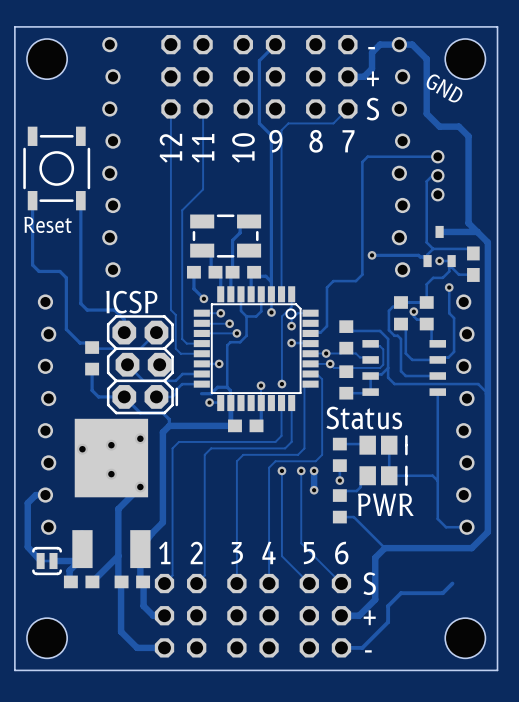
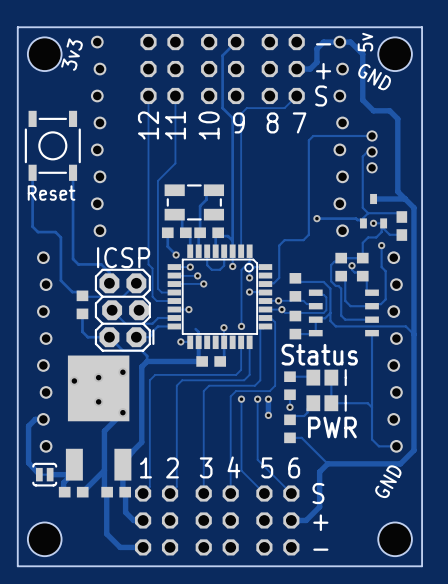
text: none -> 5v (365, 42)
text: none -> 3v3 (72, 54)
track: (246, 316) (246, 335) (240, 342) (230, 342) (227, 345) (227, 387) (217, 387) (211, 393) (201, 393) -> none
text: none -> GND (388, 481)
track: (452, 583) (442, 593) (400, 593) (388, 606) (388, 622) (362, 647) (341, 647) -> none

